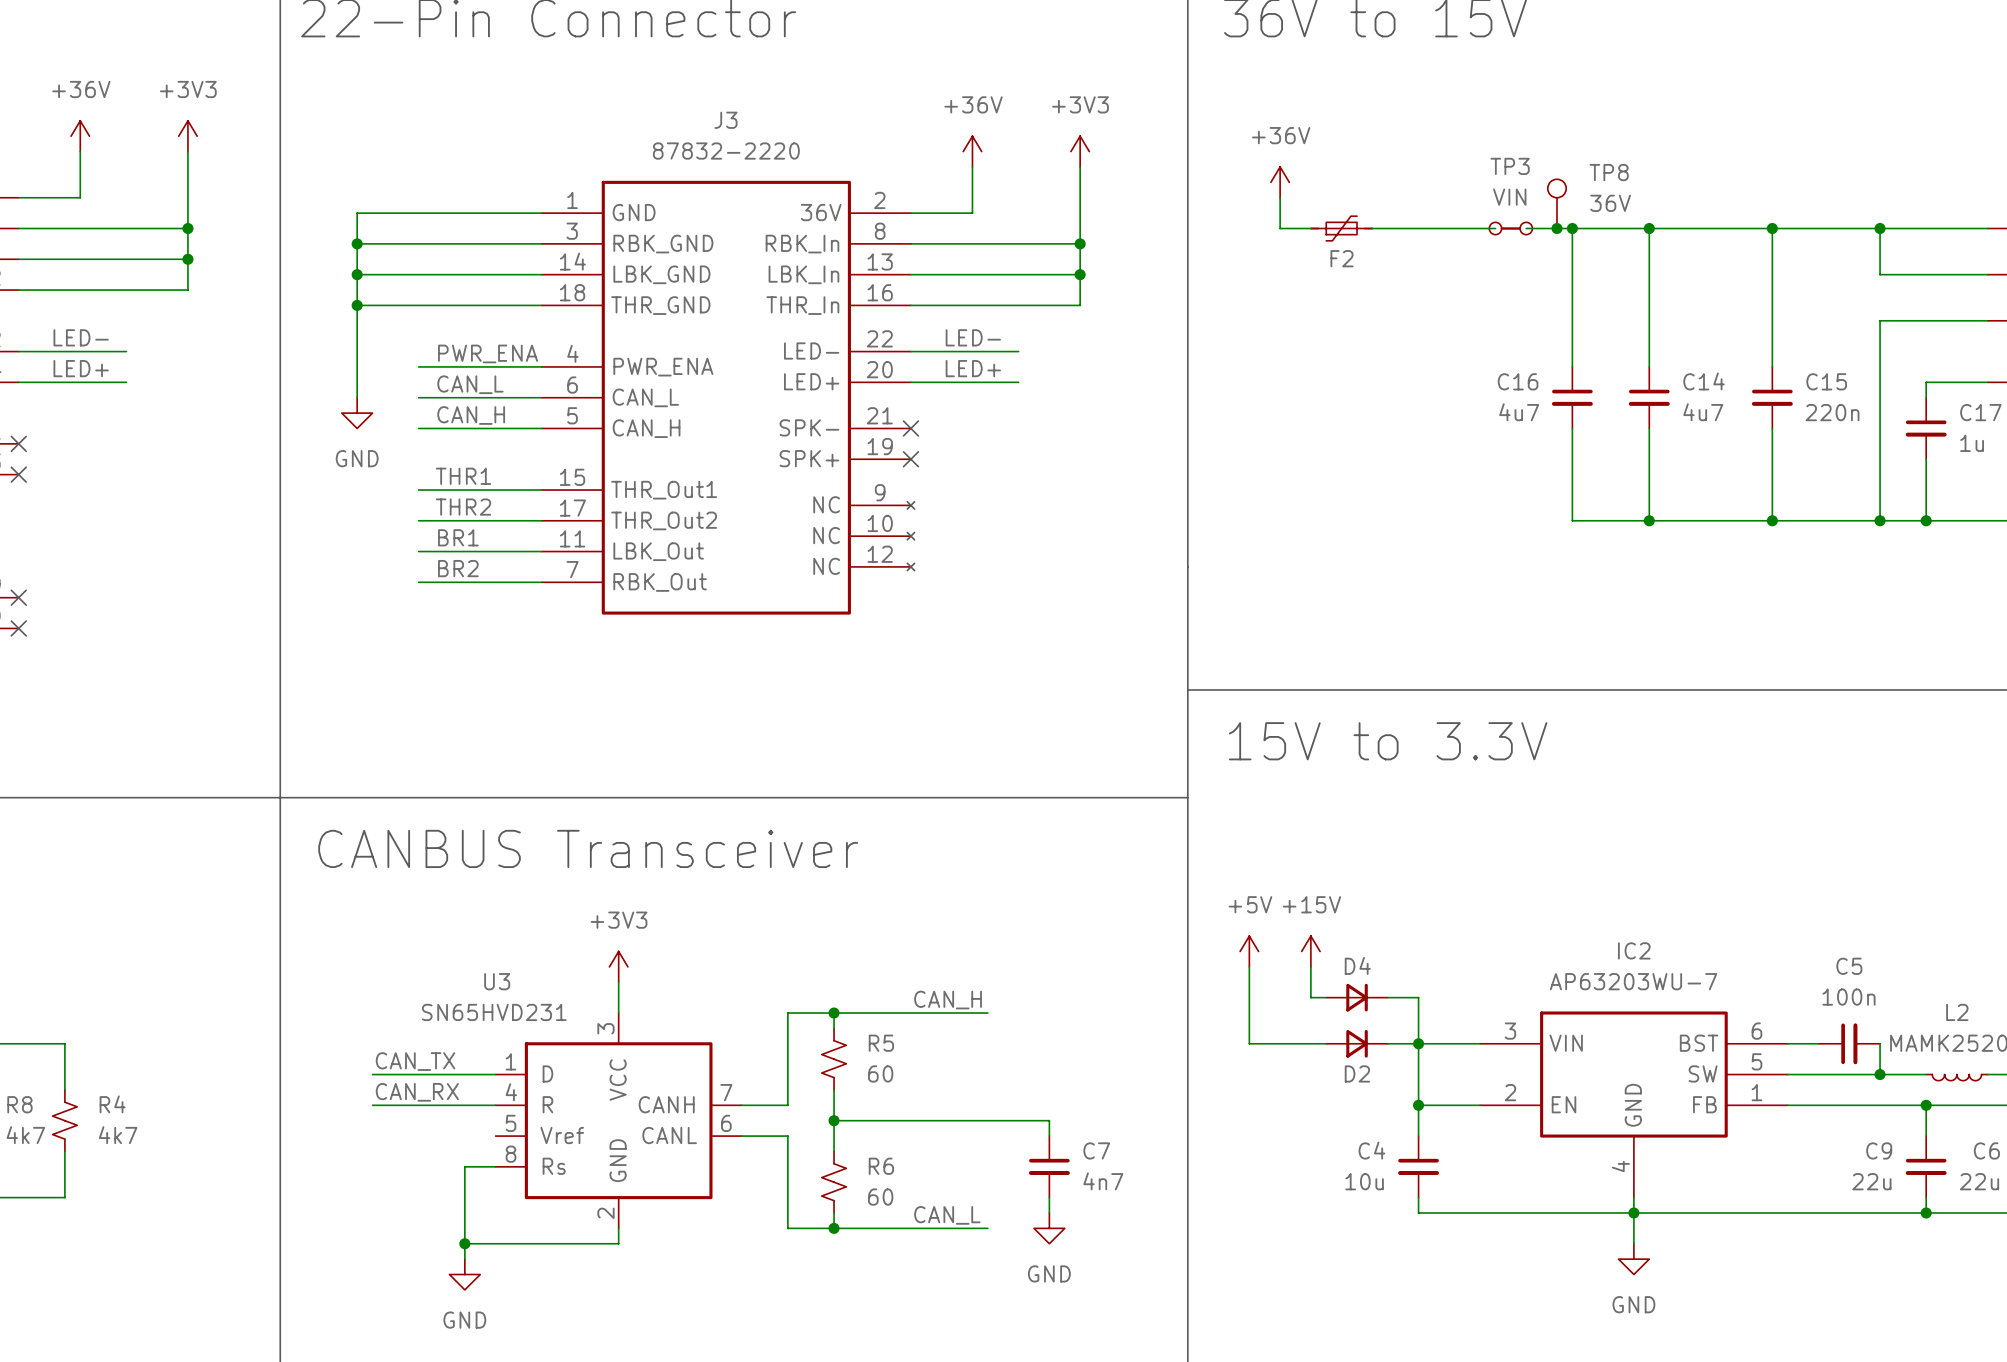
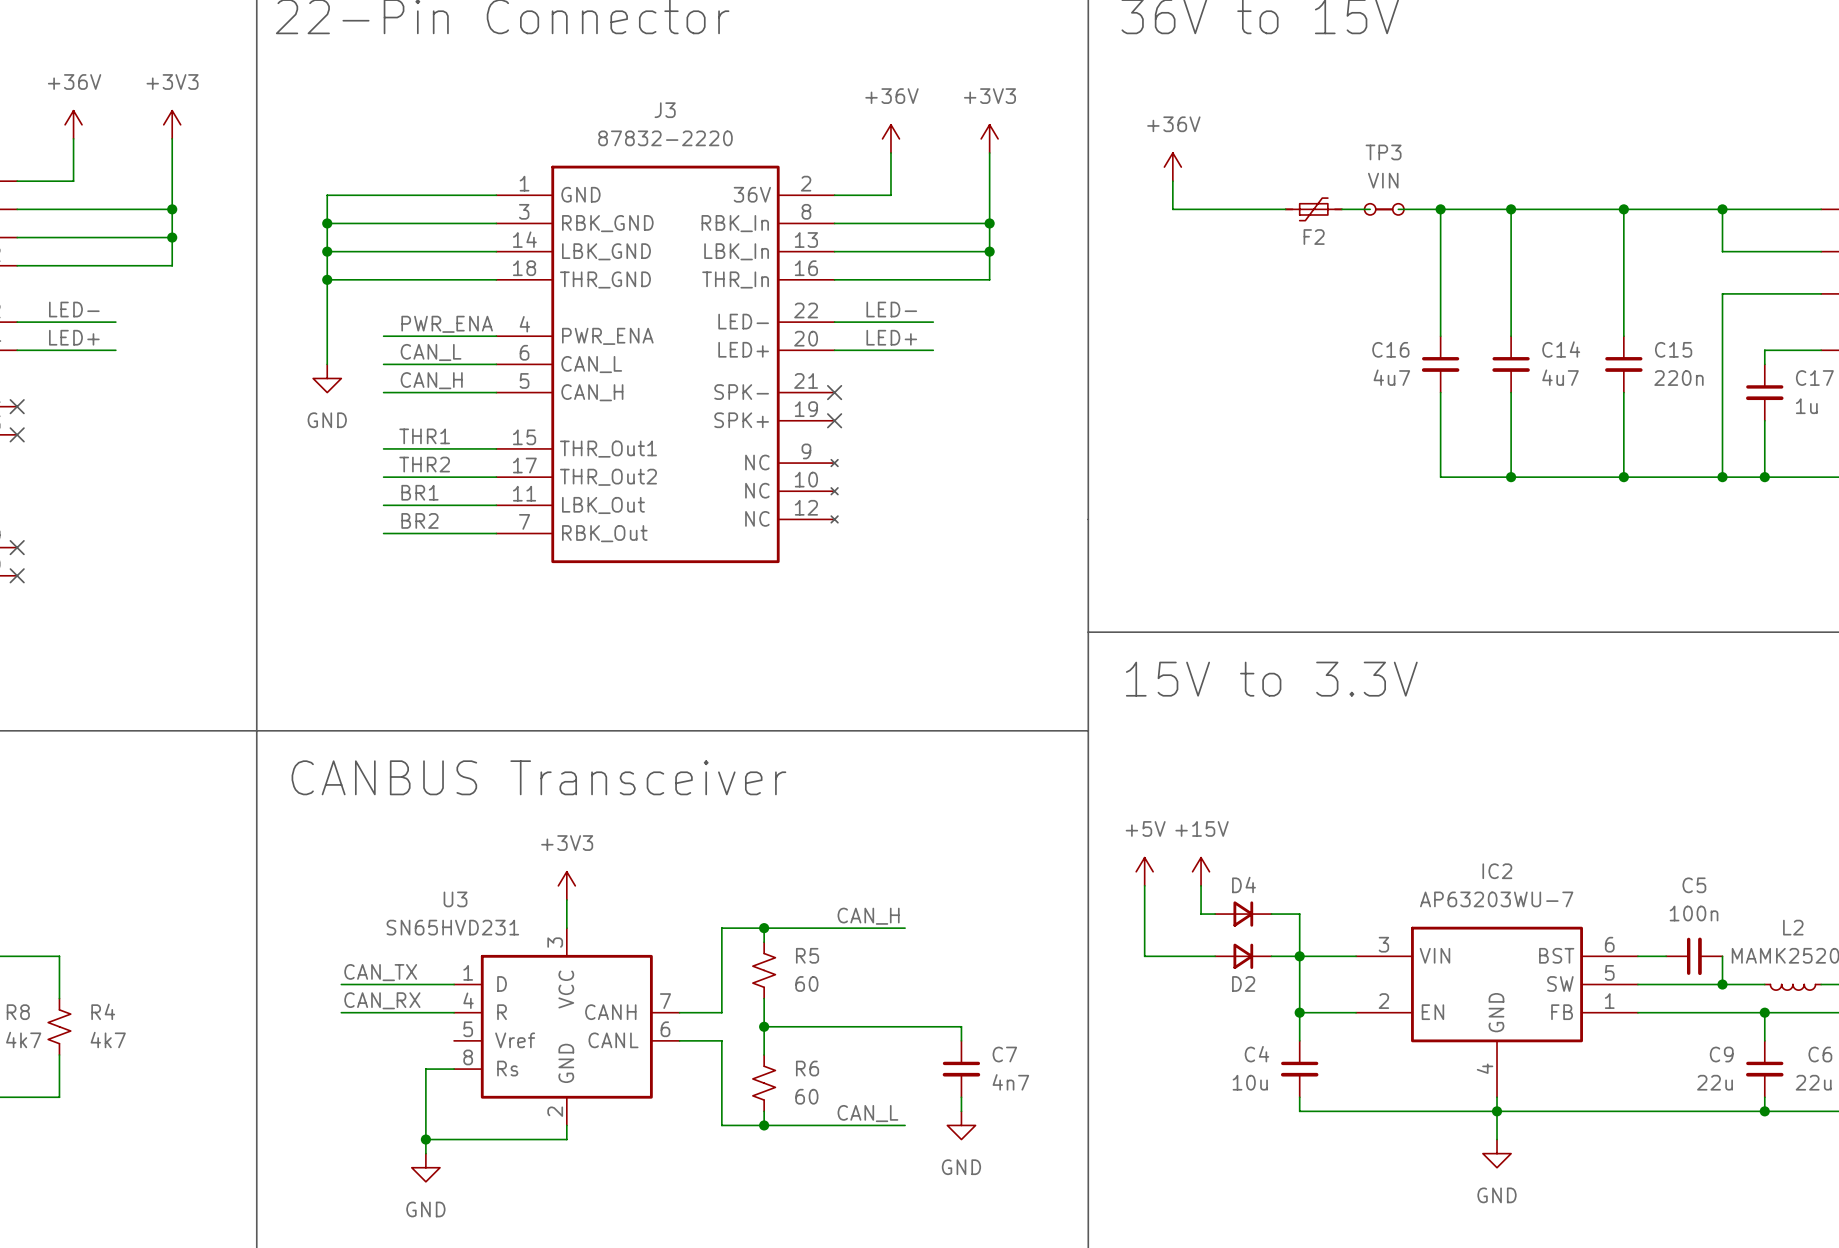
TP8: 36V (1557, 203) -> none
F2 position: (1341, 228) -> (1313, 209)
junction: (1557, 228) -> none

